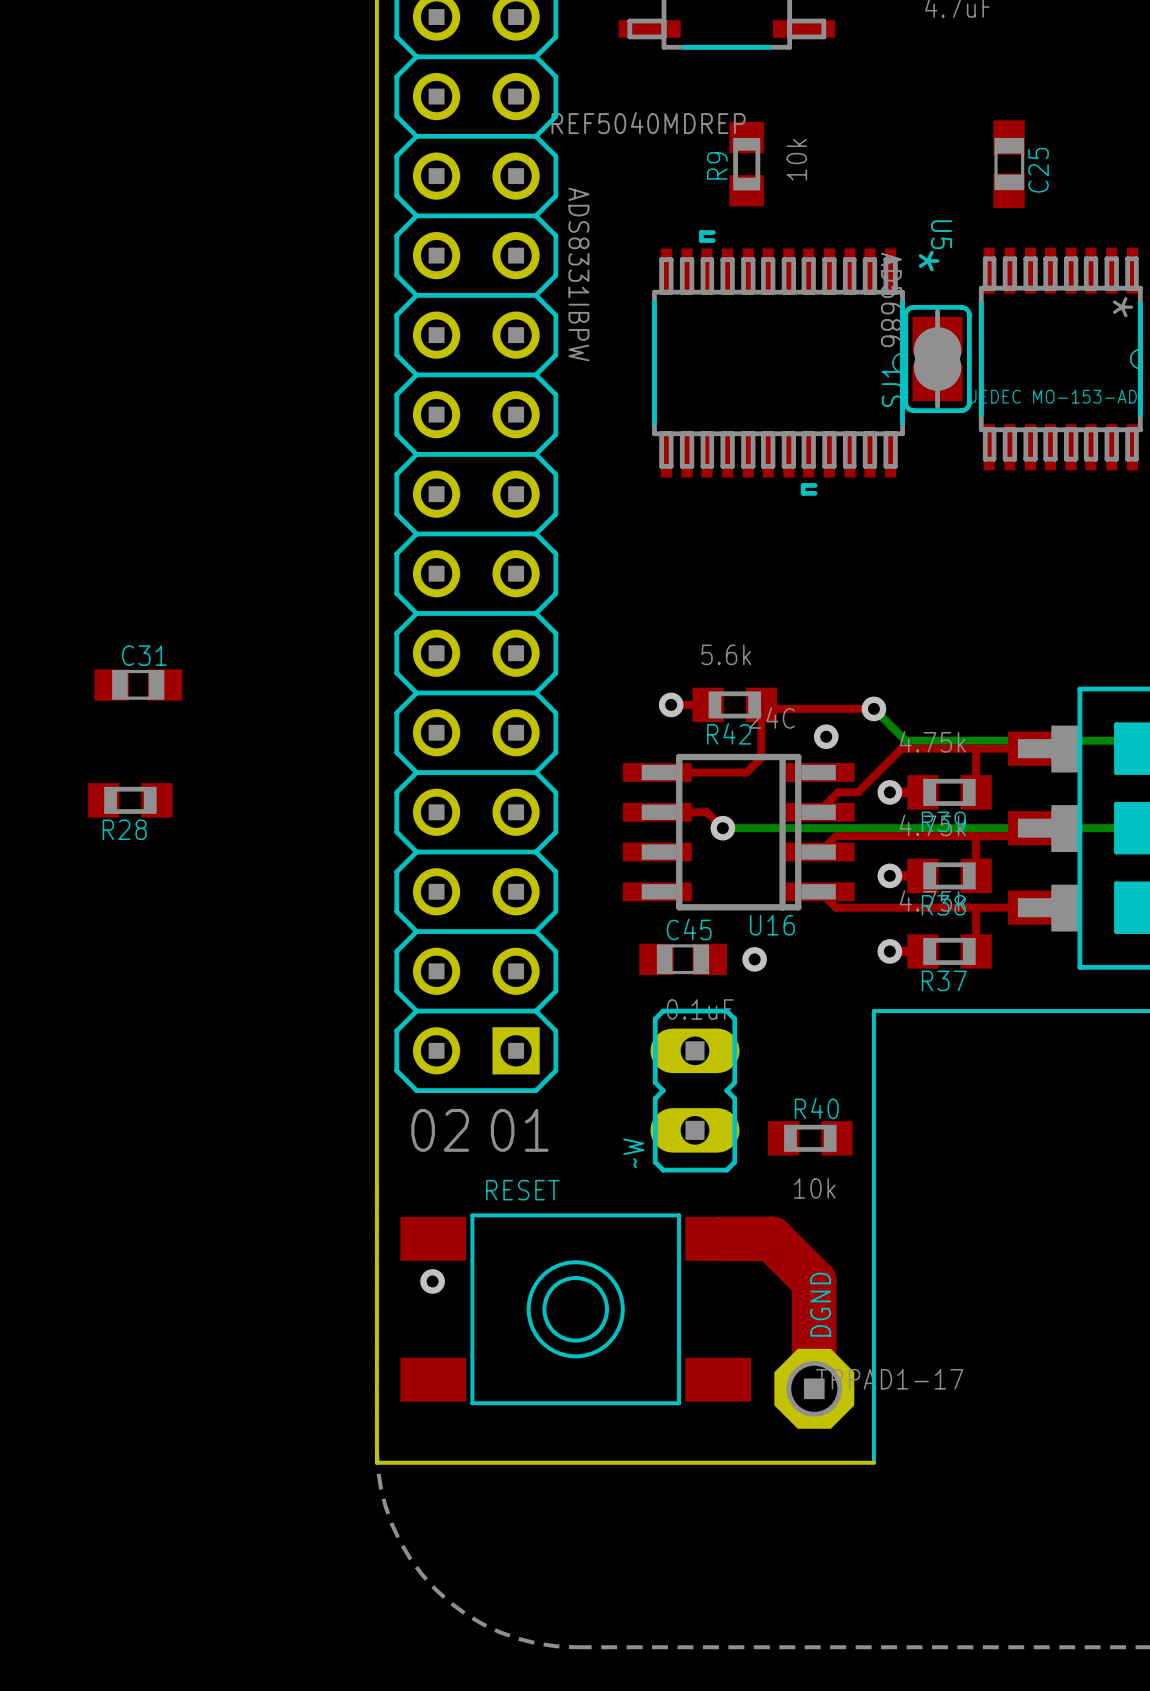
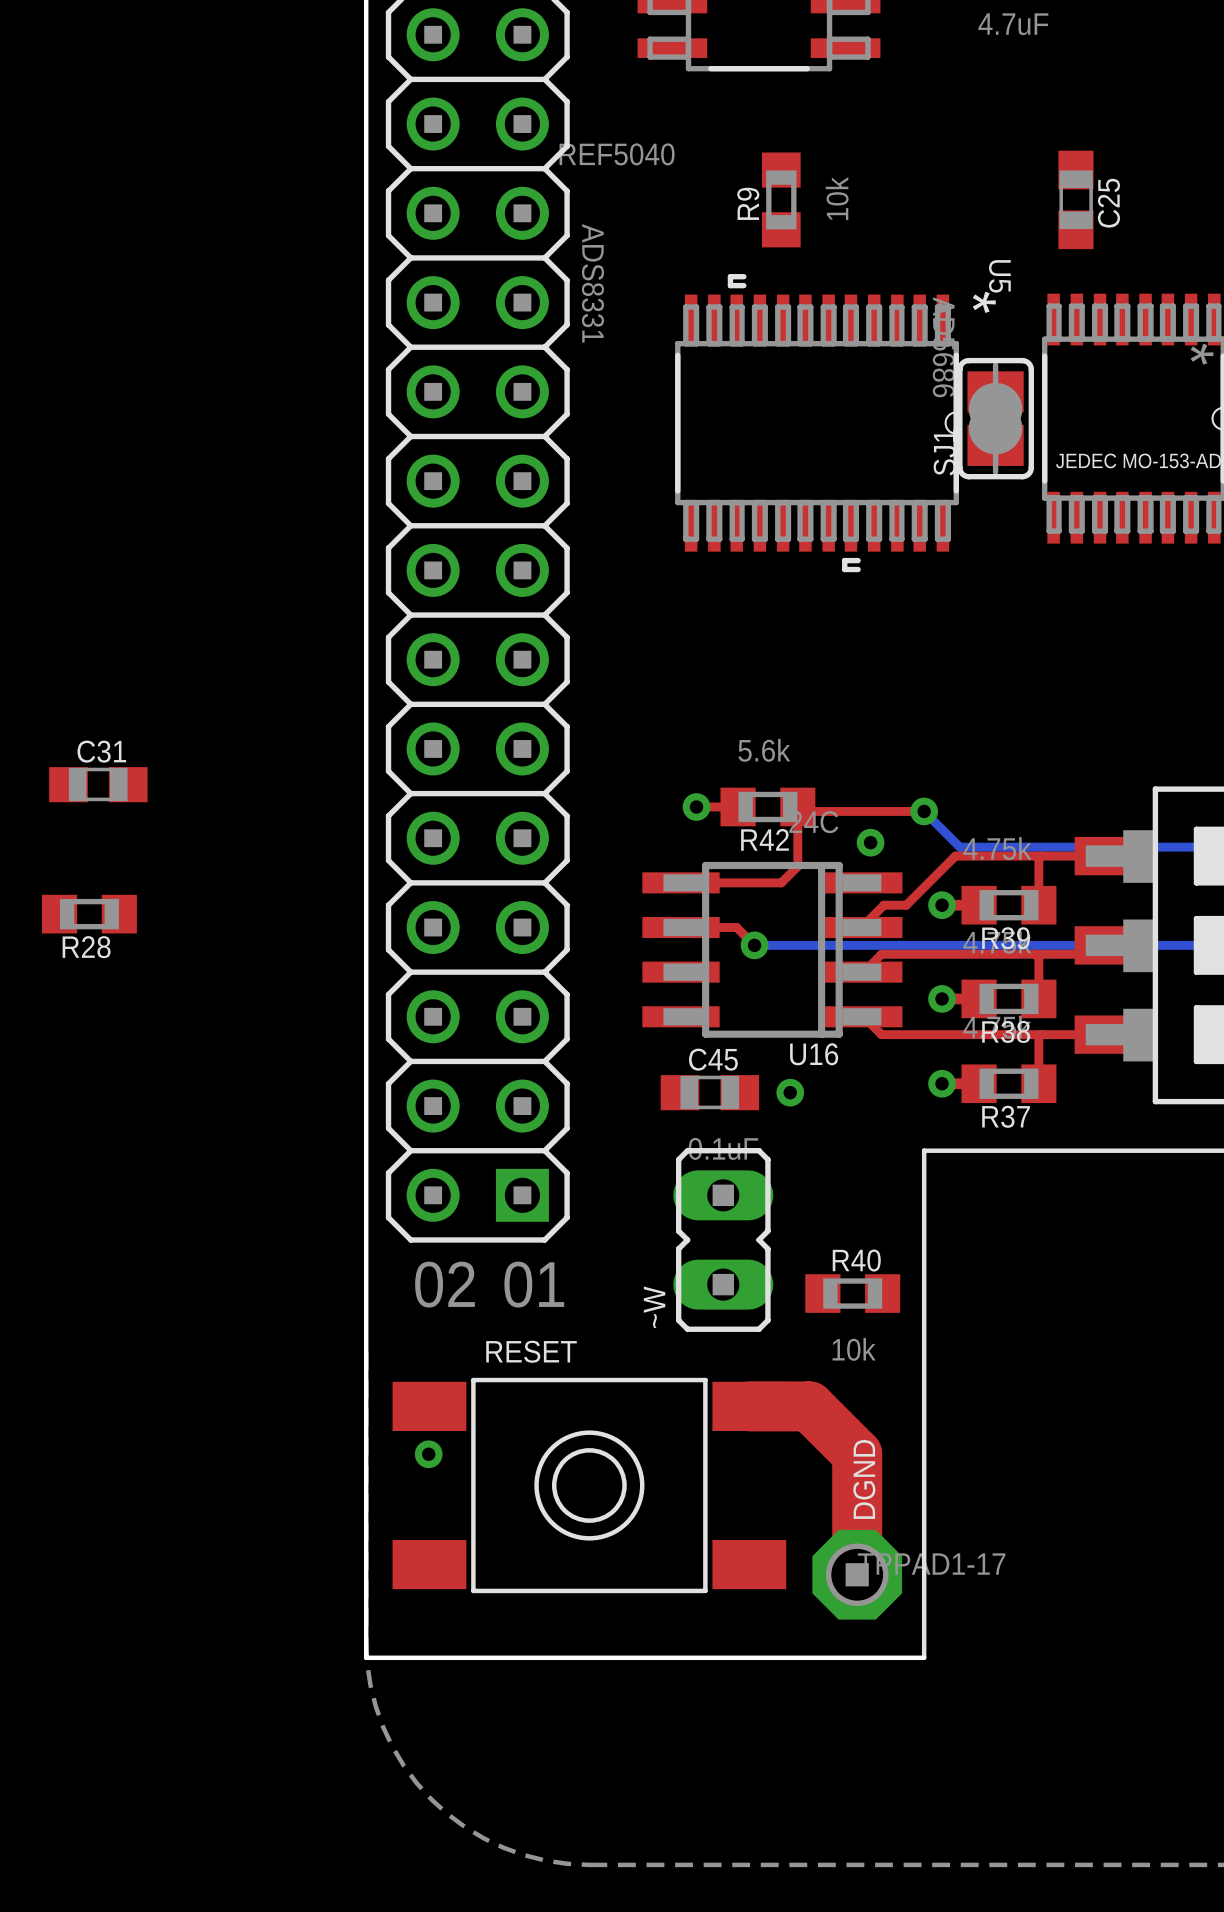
part value: REF5040MDREP (648, 123) -> REF5040 (617, 154)
U5 value: ADS8331IBPW (578, 274) -> ADS8331 (592, 283)

